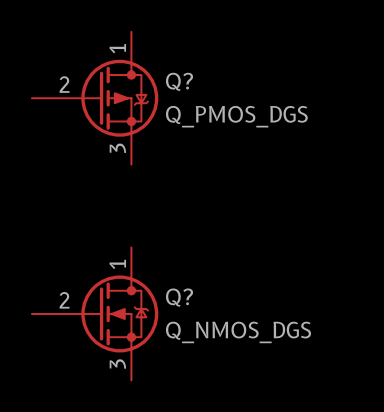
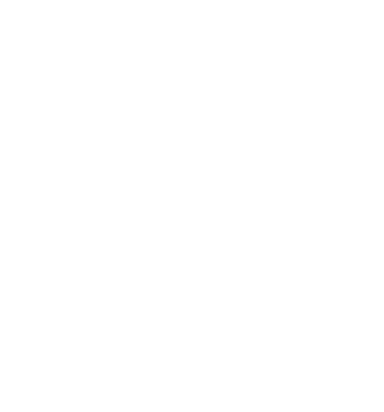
Q?: Q_PMOS_DGS (95, 98) -> none
Q?: Q_NMOS_DGS (95, 313) -> none

